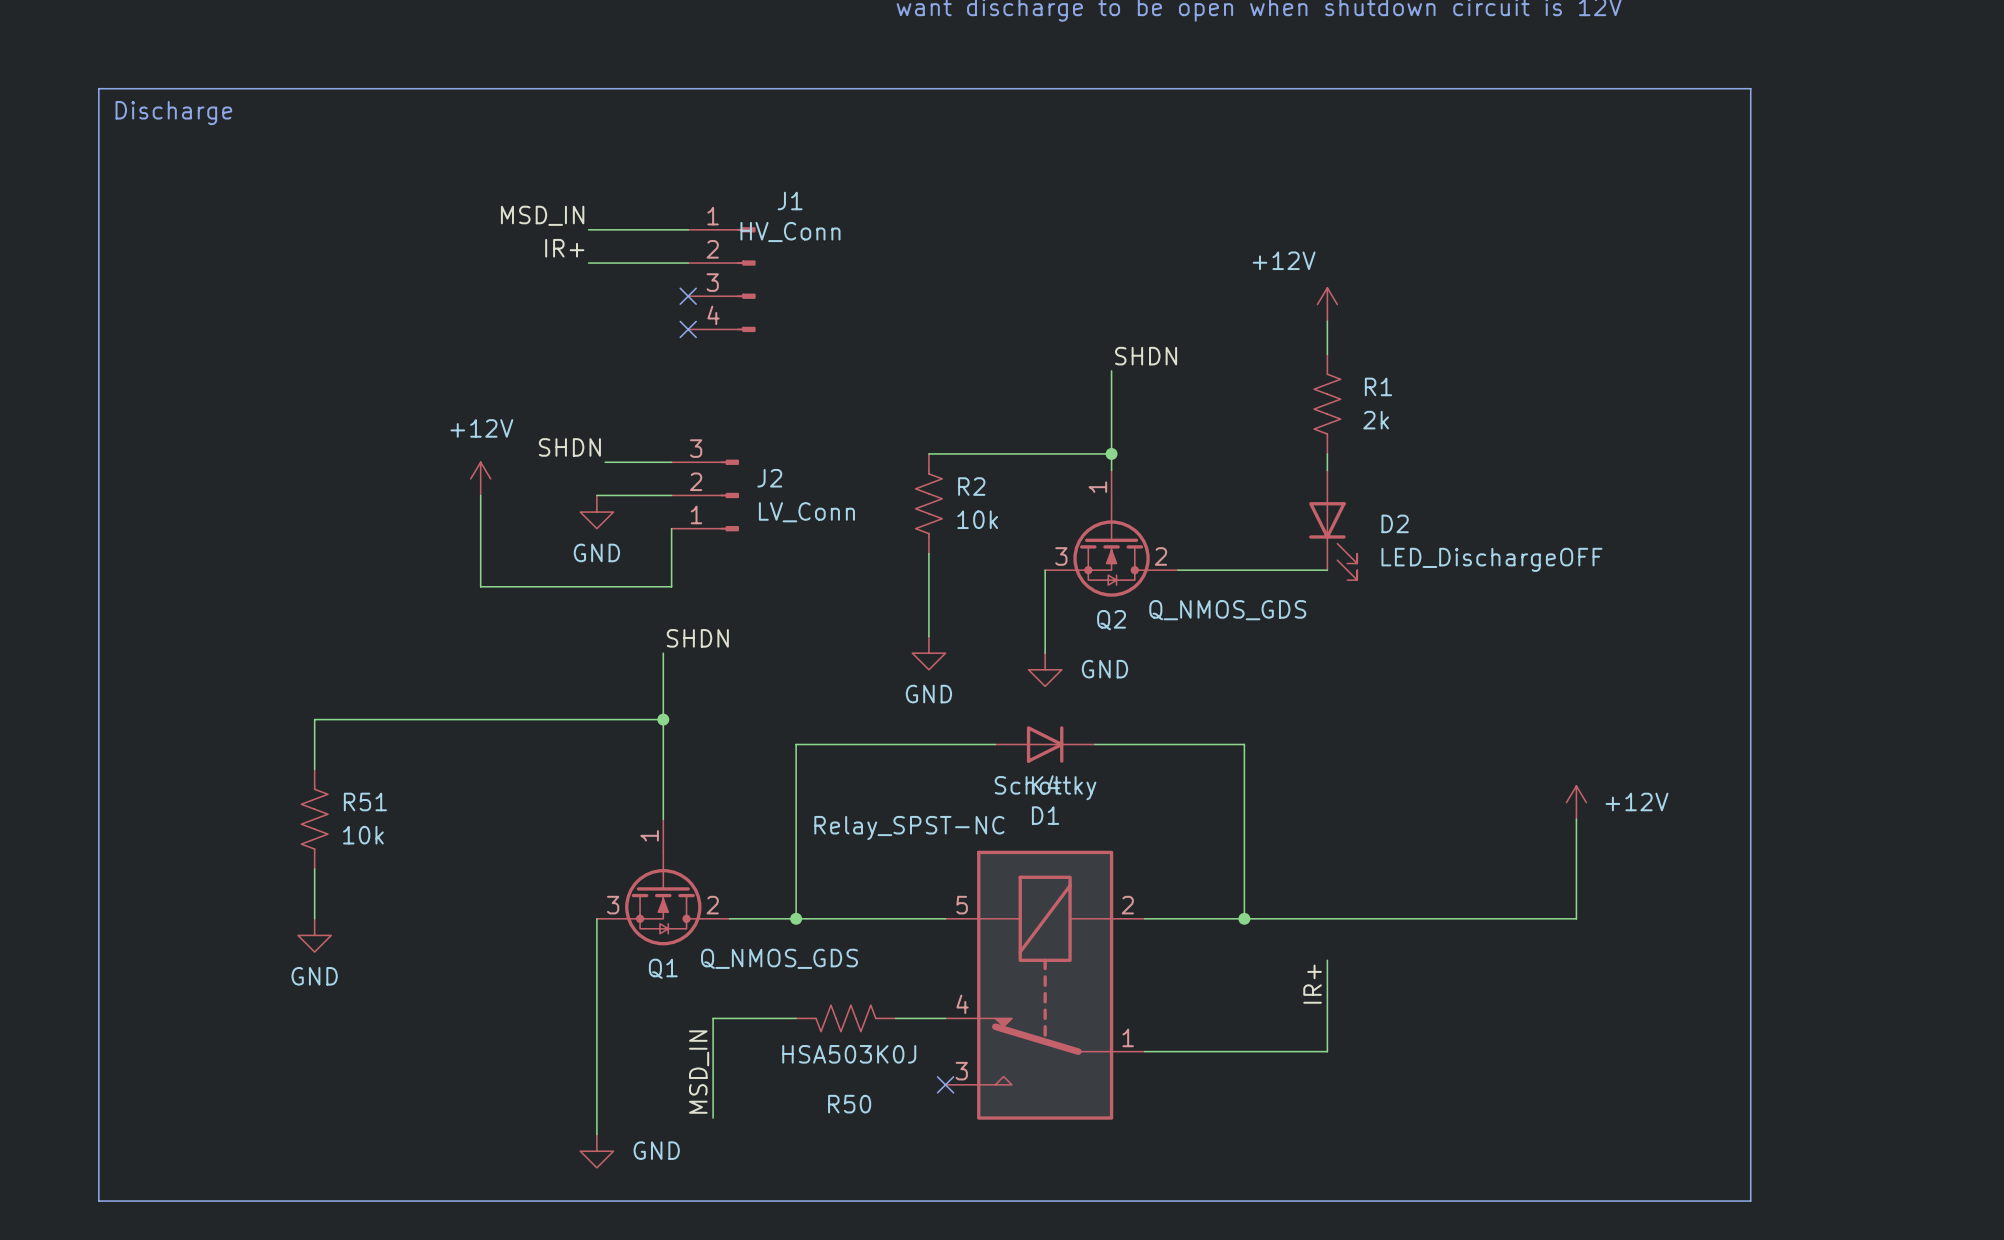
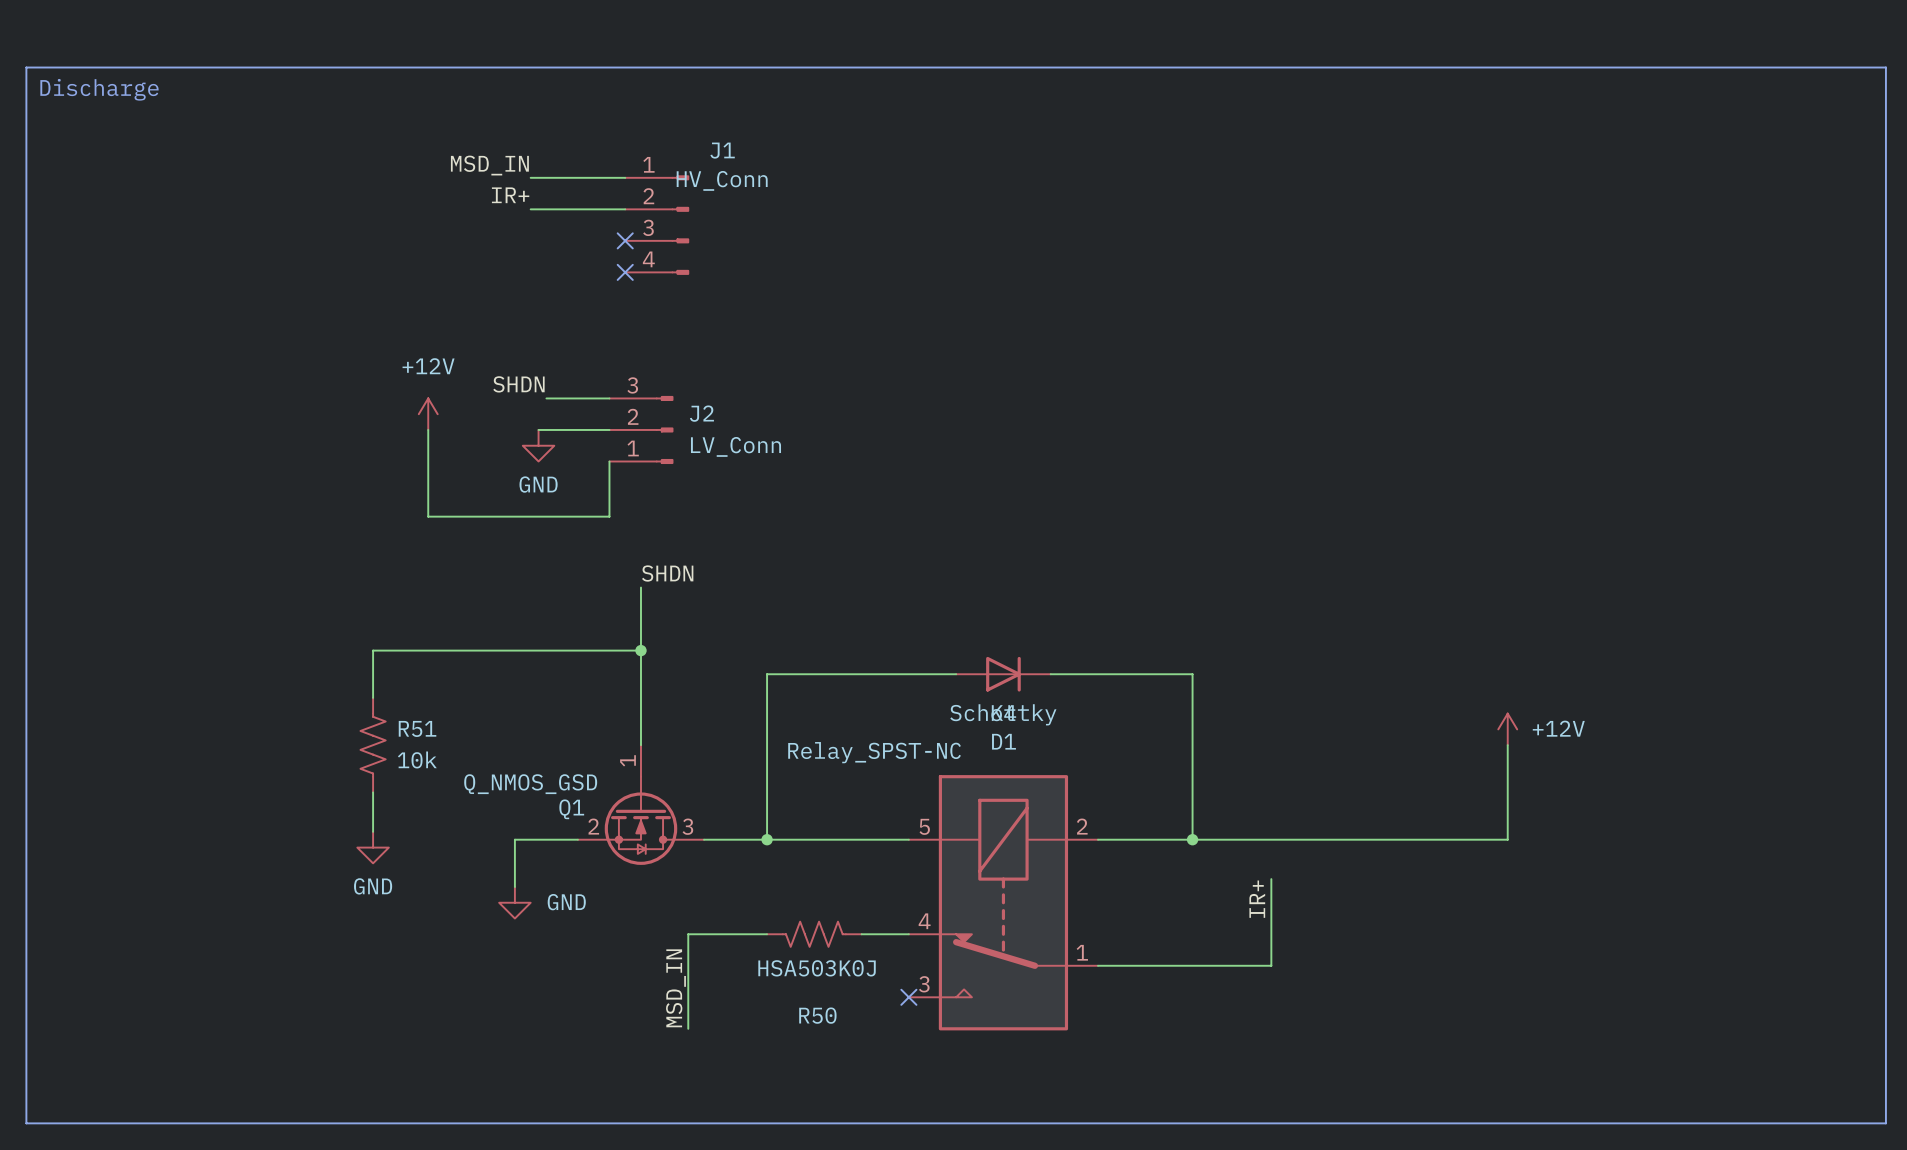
line: (98, 88) (1750, 88) (1750, 1201) (98, 1201) (98, 88) -> (26, 67) (26, 1123) (1885, 1123) (1885, 67) (26, 67)
text position: Discharge (173, 113) -> Discharge (99, 89)
label position: MSD_IN (542, 215) -> MSD_IN (489, 165)
wire: (588, 229) (688, 229) -> (530, 177) (625, 177)
label position: IR+ (564, 248) -> IR+ (510, 195)
wire: (588, 263) (688, 263) -> (530, 209) (625, 209)
J1 position: (721, 279) -> (657, 225)
no-connect mark: none -> (625, 240)
no-connect mark: (688, 296) -> none
power symbol: +12V (1327, 304) -> none
no-connect mark: none -> (625, 272)
wire: (1327, 321) (1327, 354) -> none
no-connect mark: (688, 329) -> none
label: SHDN (1146, 356) -> none
wire: (1111, 370) (1111, 470) -> none
R1: 2k (1327, 404) -> none
label position: SHDN (569, 447) -> SHDN (518, 384)
wire: (928, 453) (1111, 453) -> none
junction: (1111, 453) -> none
wire: (1327, 453) (1327, 470) -> none
wire: (605, 462) (671, 462) -> (546, 398) (609, 398)
power symbol position: +12V (480, 478) -> +12V (428, 414)
wire: (480, 495) (480, 586) (671, 586) (671, 528) -> (428, 429) (428, 516) (609, 516) (609, 461)
wire: (596, 495) (671, 495) -> (538, 429) (609, 429)
J2 position: (705, 495) -> (641, 429)
R2: 10k (928, 503) -> none
power symbol position: GND (596, 512) -> GND (538, 445)
D2: LED_DischargeOFF (1333, 525) -> none
Q2: Q_NMOS_GDS (1111, 533) -> none
wire: (928, 553) (928, 636) -> none
wire: (1045, 570) (1045, 653) -> none
wire: (1177, 570) (1327, 570) -> none
power symbol: GND (928, 653) -> none
power symbol: GND (1045, 669) -> none
wire: (381, 719) (314, 719) (314, 769) -> (373, 650) (373, 697)
R51 position: (314, 819) -> (373, 745)
wire: (314, 869) (314, 918) -> none
wire: none -> (373, 792) (373, 831)
Q1 pin number: 3 (613, 905) -> 2 (593, 826)
Q1 pin number: 2 (712, 905) -> 3 (687, 826)
wire: (596, 918) (596, 1134) -> (577, 839) (514, 839) (514, 886)
power symbol position: GND (314, 935) -> GND (373, 847)
Q1 value: Q_NMOS_GDS (779, 958) -> Q_NMOS_GSD (530, 784)
Q1 name position: Q1 (663, 968) -> Q1 (571, 809)
power symbol: none -> GND (514, 902)
power symbol: GND (596, 1151) -> none

